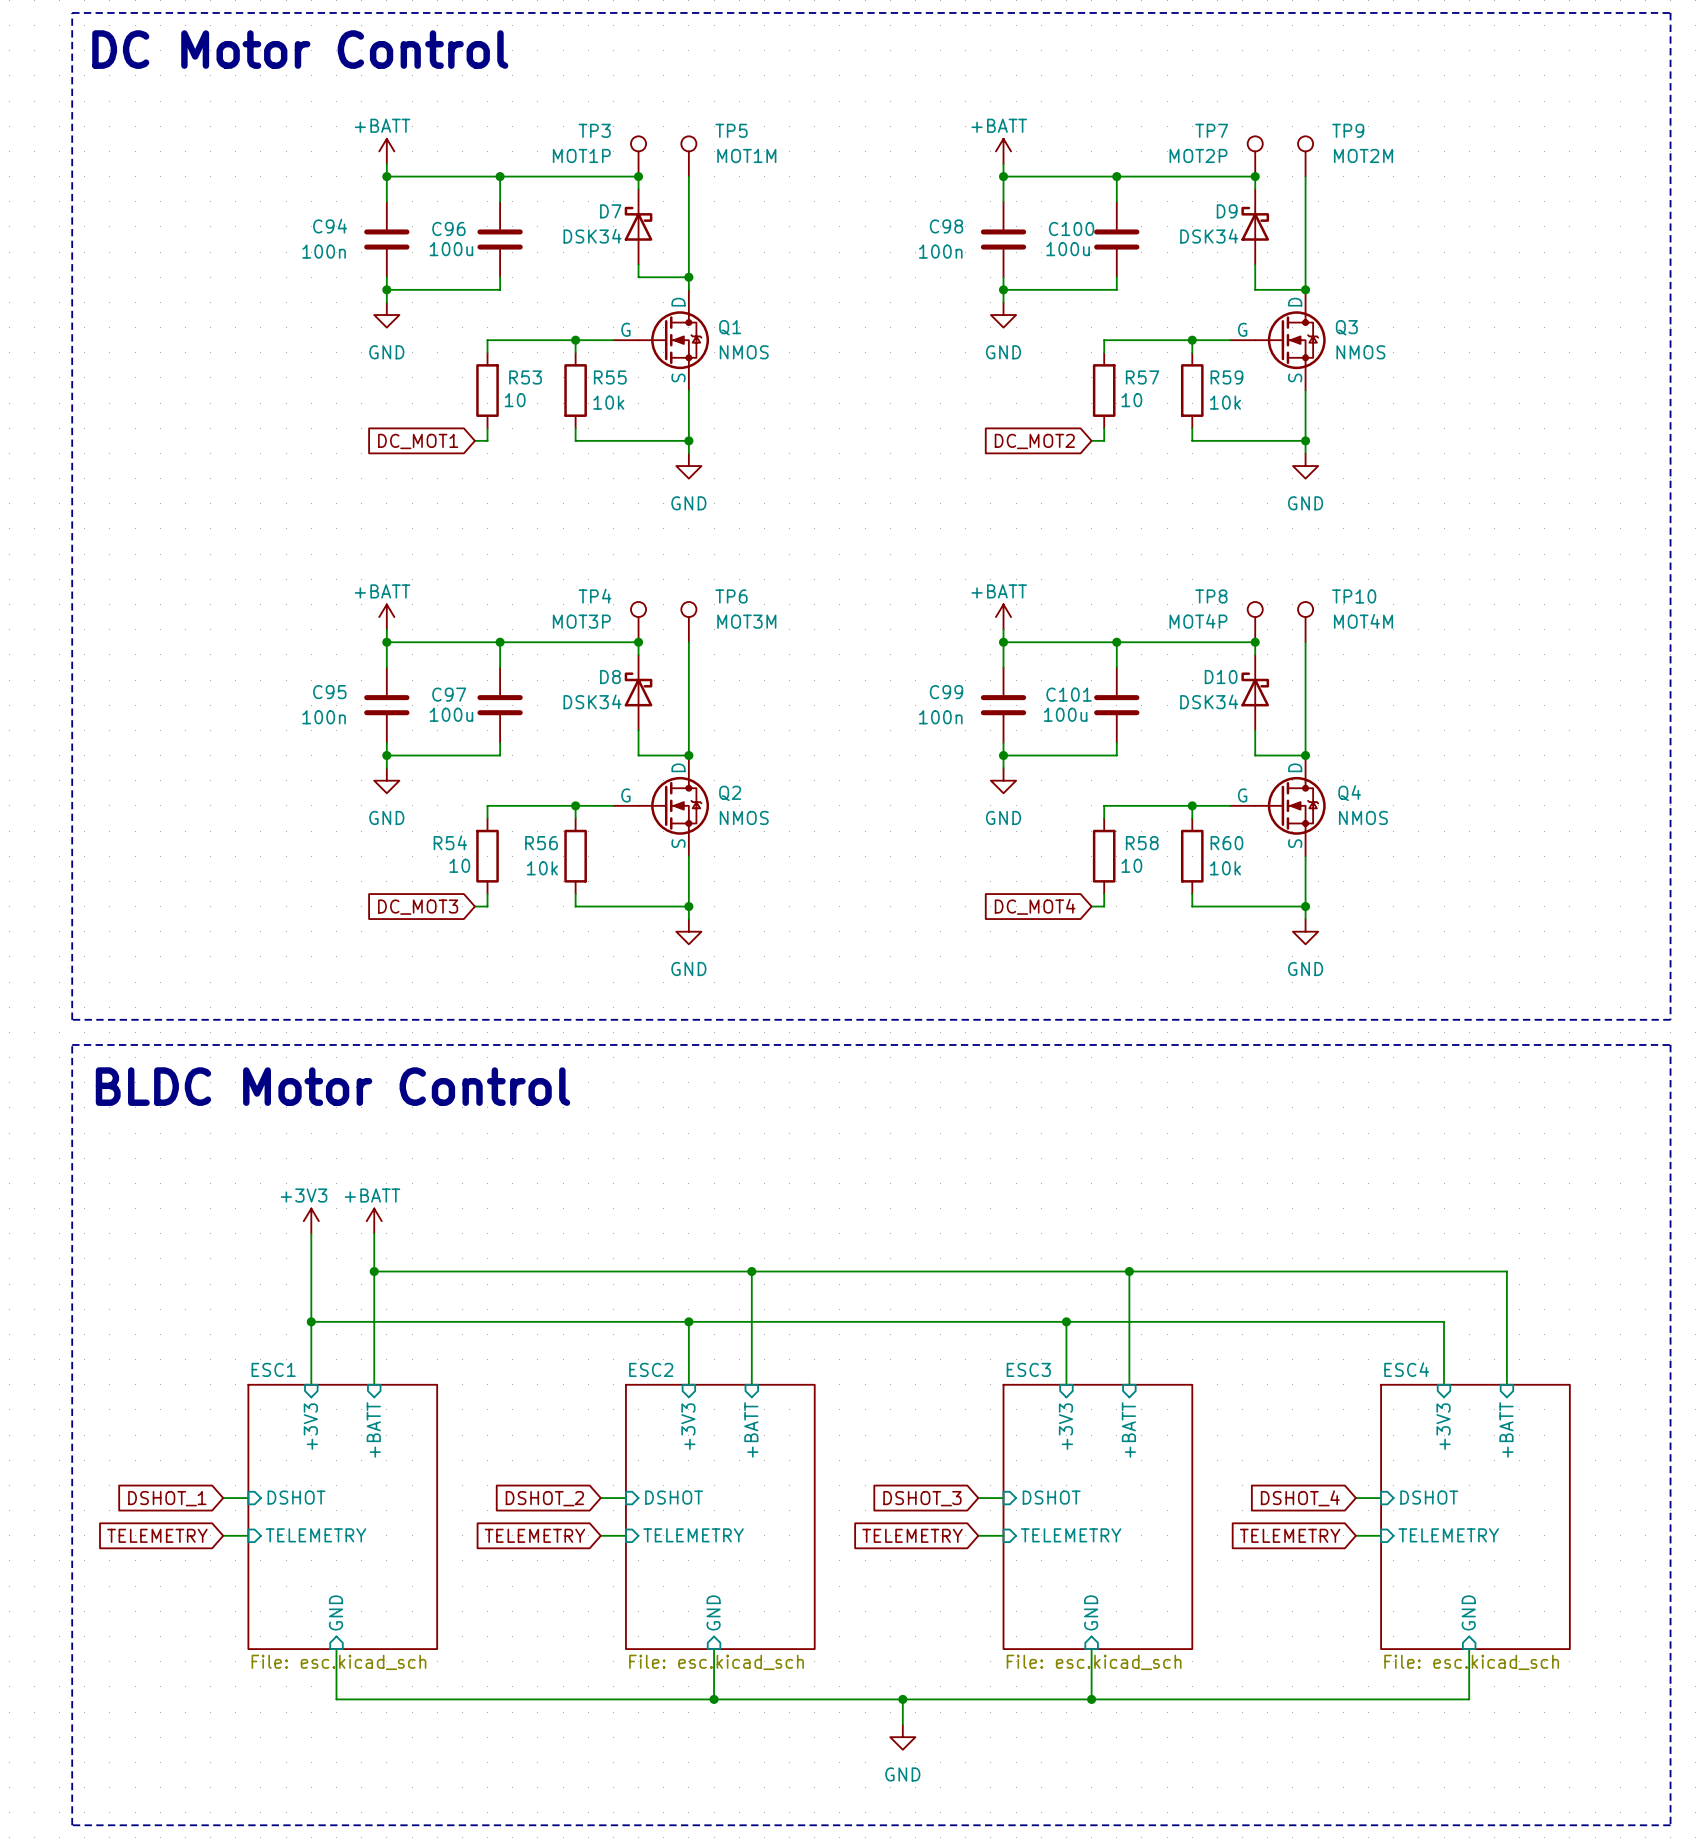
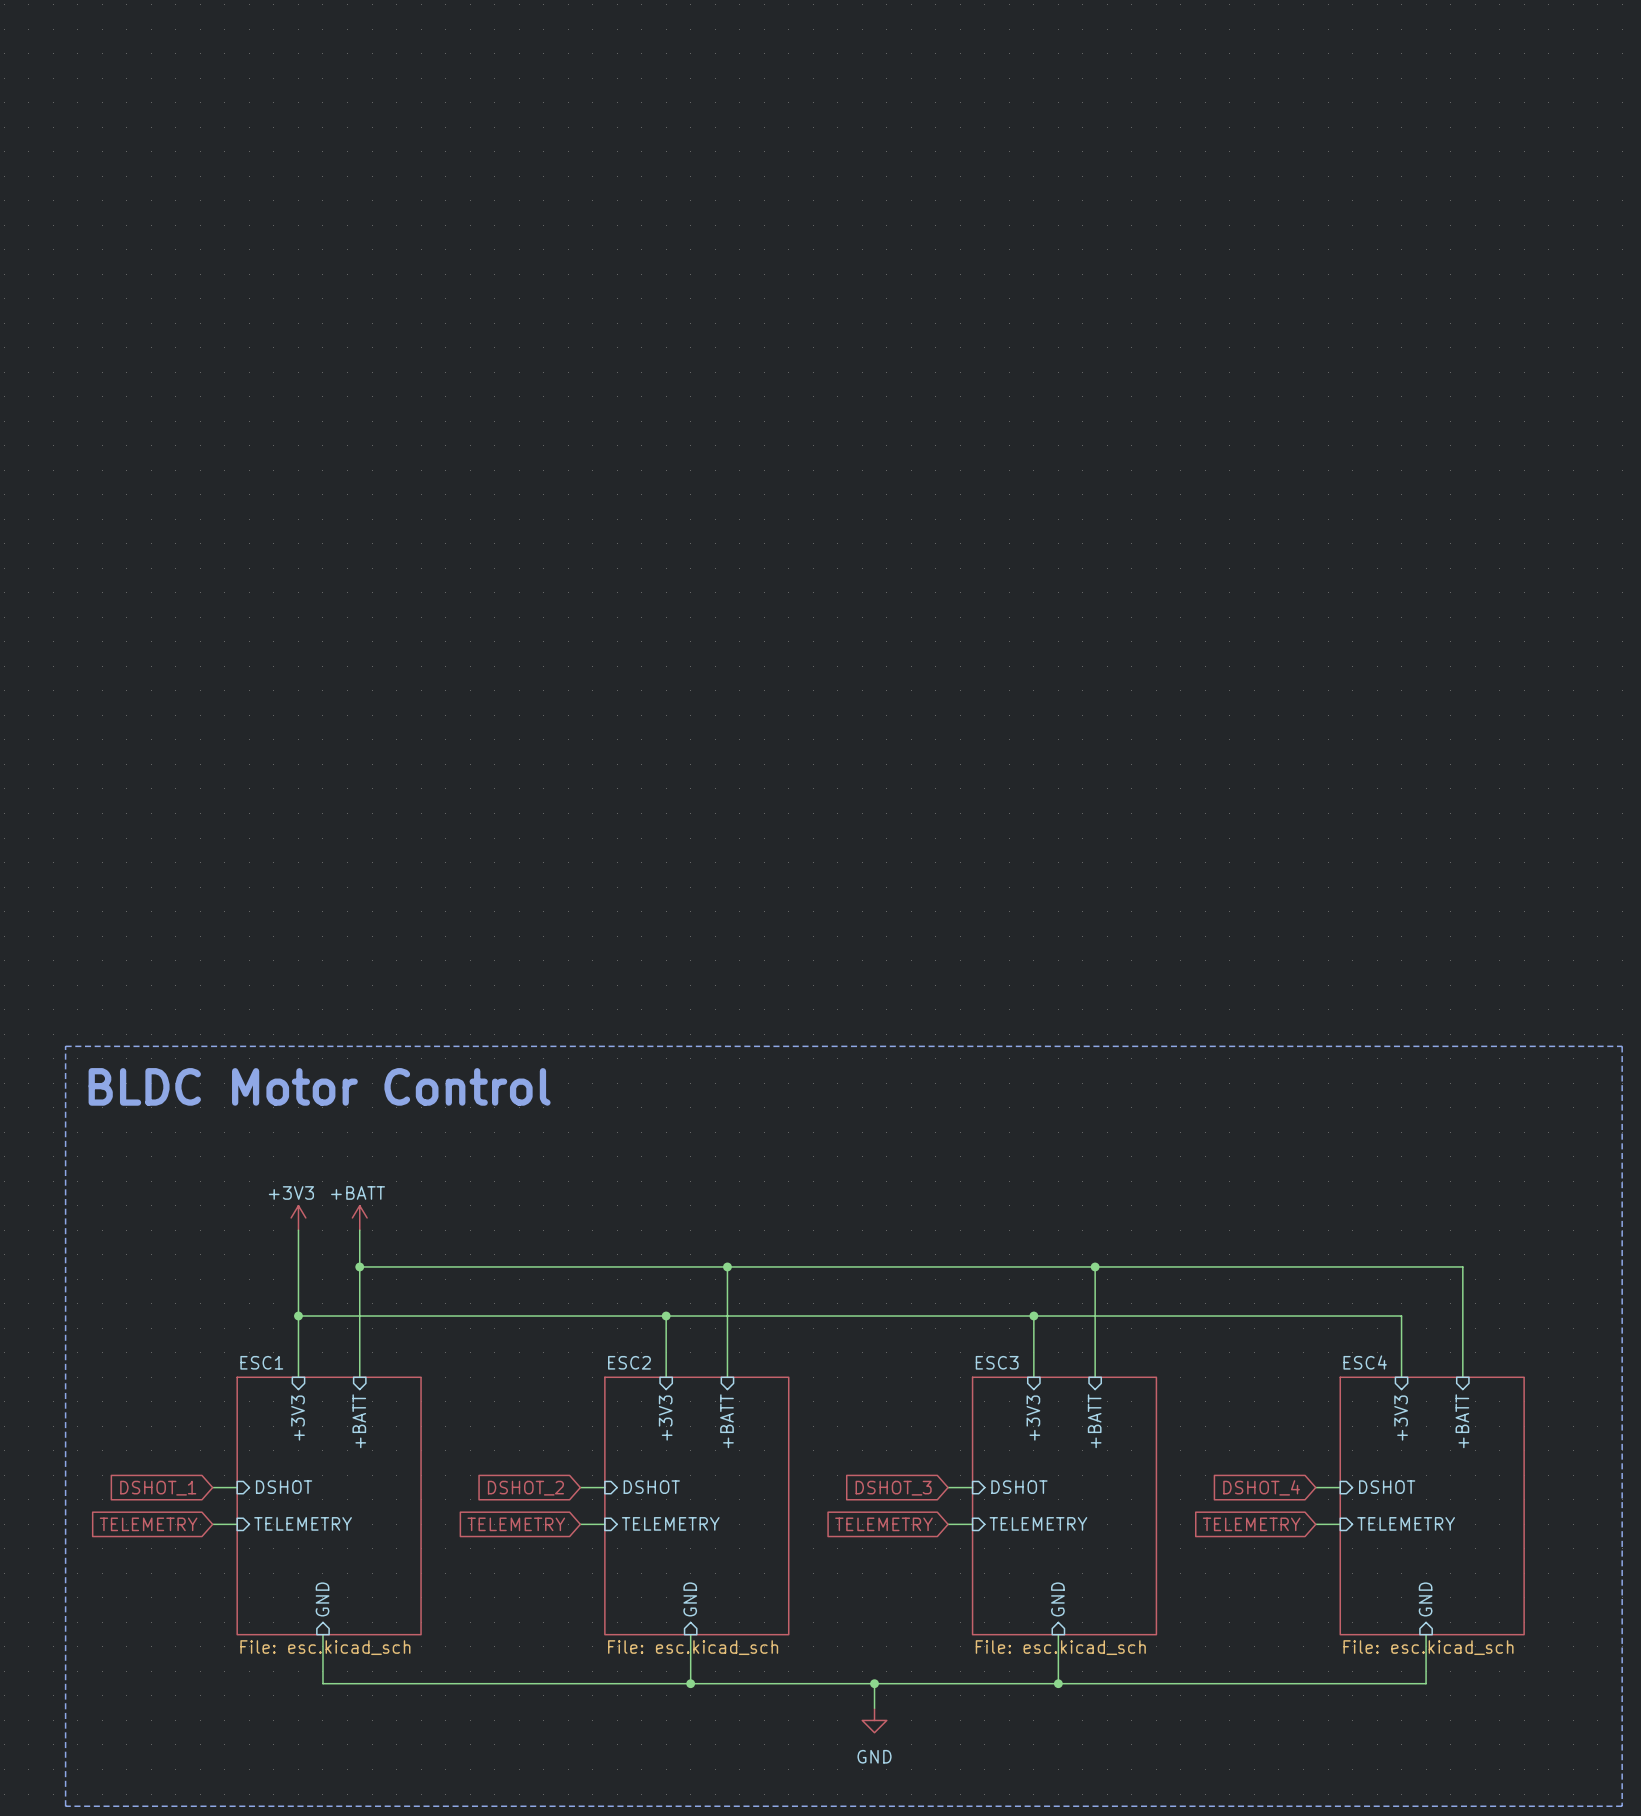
line: (72, 12) (1670, 12) (1670, 1019) (72, 1019) (72, 12) -> none
text: DC Motor Control (300, 49) -> none
power symbol: +BATT (386, 151) -> none
power symbol: +BATT (1003, 151) -> none
TP3: MOT1P (638, 156) -> none
TP5: MOT1M (688, 156) -> none
TP7: MOT2P (1255, 156) -> none
TP9: MOT2M (1305, 156) -> none
wire: (386, 163) (386, 201) -> none
wire: (1003, 163) (1003, 201) -> none
wire: (386, 176) (638, 176) (638, 189) -> none
junction: (386, 176) -> none
wire: (500, 176) (500, 201) -> none
junction: (500, 176) -> none
junction: (638, 176) -> none
wire: (688, 176) (688, 289) -> none
wire: (1003, 176) (1255, 176) (1255, 189) -> none
junction: (1003, 176) -> none
wire: (1116, 176) (1116, 201) -> none
junction: (1116, 176) -> none
junction: (1255, 176) -> none
wire: (1305, 176) (1305, 289) (1255, 289) (1255, 264) -> none
D7: DSK34 (638, 226) -> none
D9: DSK34 (1255, 226) -> none
C94: 100n (386, 239) -> none
C96: 100u (500, 239) -> none
C98: 100n (1003, 239) -> none
C100: 100u (1116, 239) -> none
wire: (638, 264) (638, 277) (688, 277) -> none
wire: (386, 277) (386, 302) -> none
wire: (500, 277) (500, 289) (386, 289) -> none
junction: (688, 277) -> none
wire: (1003, 277) (1003, 302) -> none
wire: (1116, 277) (1116, 289) (1003, 289) -> none
junction: (386, 289) -> none
junction: (1003, 289) -> none
junction: (1305, 289) -> none
power symbol: GND (386, 315) -> none
power symbol: GND (1003, 315) -> none
wire: (575, 340) (575, 352) -> none
junction: (575, 340) -> none
wire: (613, 340) (487, 340) (487, 352) -> none
Q1: NMOS (661, 340) -> none
wire: (1192, 340) (1192, 352) -> none
junction: (1192, 340) -> none
wire: (1230, 340) (1104, 340) (1104, 352) -> none
Q3: NMOS (1277, 340) -> none
R53: 10 (487, 390) -> none
R55: 10k (575, 390) -> none
wire: (688, 390) (688, 453) -> none
R57: 10 (1104, 390) -> none
R59: 10k (1192, 390) -> none
wire: (1305, 390) (1305, 453) -> none
wire: (487, 428) (487, 440) (474, 440) -> none
wire: (575, 428) (575, 440) (688, 440) -> none
wire: (1104, 428) (1104, 440) (1091, 440) -> none
wire: (1192, 428) (1192, 440) (1305, 440) -> none
junction: (688, 440) -> none
junction: (1305, 440) -> none
global label: DC_MOT1 (418, 441) -> none
global label: DC_MOT2 (1034, 441) -> none
power symbol: GND (688, 466) -> none
power symbol: GND (1305, 466) -> none
power symbol: +BATT (386, 617) -> none
power symbol: +BATT (1003, 617) -> none
TP4: MOT3P (638, 622) -> none
TP6: MOT3M (688, 622) -> none
TP8: MOT4P (1255, 622) -> none
TP10: MOT4M (1305, 622) -> none
wire: (386, 629) (386, 667) -> none
wire: (1003, 629) (1003, 667) -> none
wire: (386, 642) (638, 642) (638, 654) -> none
junction: (386, 642) -> none
wire: (500, 642) (500, 667) -> none
junction: (500, 642) -> none
junction: (638, 642) -> none
wire: (688, 642) (688, 755) (638, 755) (638, 730) -> none
wire: (1003, 642) (1255, 642) (1255, 654) -> none
junction: (1003, 642) -> none
wire: (1116, 642) (1116, 667) -> none
junction: (1116, 642) -> none
junction: (1255, 642) -> none
wire: (1305, 642) (1305, 755) (1255, 755) (1255, 730) -> none
D8: DSK34 (638, 692) -> none
D10: DSK34 (1255, 692) -> none
C95: 100n (386, 705) -> none
C97: 100u (500, 705) -> none
C99: 100n (1003, 705) -> none
C101: 100u (1116, 705) -> none
wire: (386, 742) (386, 768) -> none
wire: (500, 742) (500, 755) (386, 755) -> none
wire: (1003, 742) (1003, 768) -> none
wire: (1116, 742) (1116, 755) (1003, 755) -> none
junction: (386, 755) -> none
junction: (688, 755) -> none
junction: (1003, 755) -> none
junction: (1305, 755) -> none
power symbol: GND (386, 780) -> none
power symbol: GND (1003, 780) -> none
wire: (575, 805) (575, 818) -> none
junction: (575, 805) -> none
wire: (613, 805) (487, 805) (487, 818) -> none
Q2: NMOS (661, 805) -> none
wire: (1192, 805) (1192, 818) -> none
junction: (1192, 805) -> none
wire: (1230, 805) (1104, 805) (1104, 818) -> none
Q4: NMOS (1277, 805) -> none
R54: 10 (487, 856) -> none
R56: 10k (575, 856) -> none
wire: (688, 856) (688, 919) -> none
R58: 10 (1104, 856) -> none
R60: 10k (1192, 856) -> none
wire: (1305, 856) (1305, 919) -> none
wire: (487, 893) (487, 906) (474, 906) -> none
wire: (575, 893) (575, 906) (688, 906) -> none
wire: (1104, 893) (1104, 906) (1091, 906) -> none
wire: (1192, 893) (1192, 906) (1305, 906) -> none
junction: (688, 906) -> none
global label: DC_MOT4 (1035, 906) -> none
junction: (1305, 906) -> none
global label: DC_MOT3 (418, 907) -> none
power symbol: GND (688, 931) -> none
power symbol: GND (1305, 931) -> none

